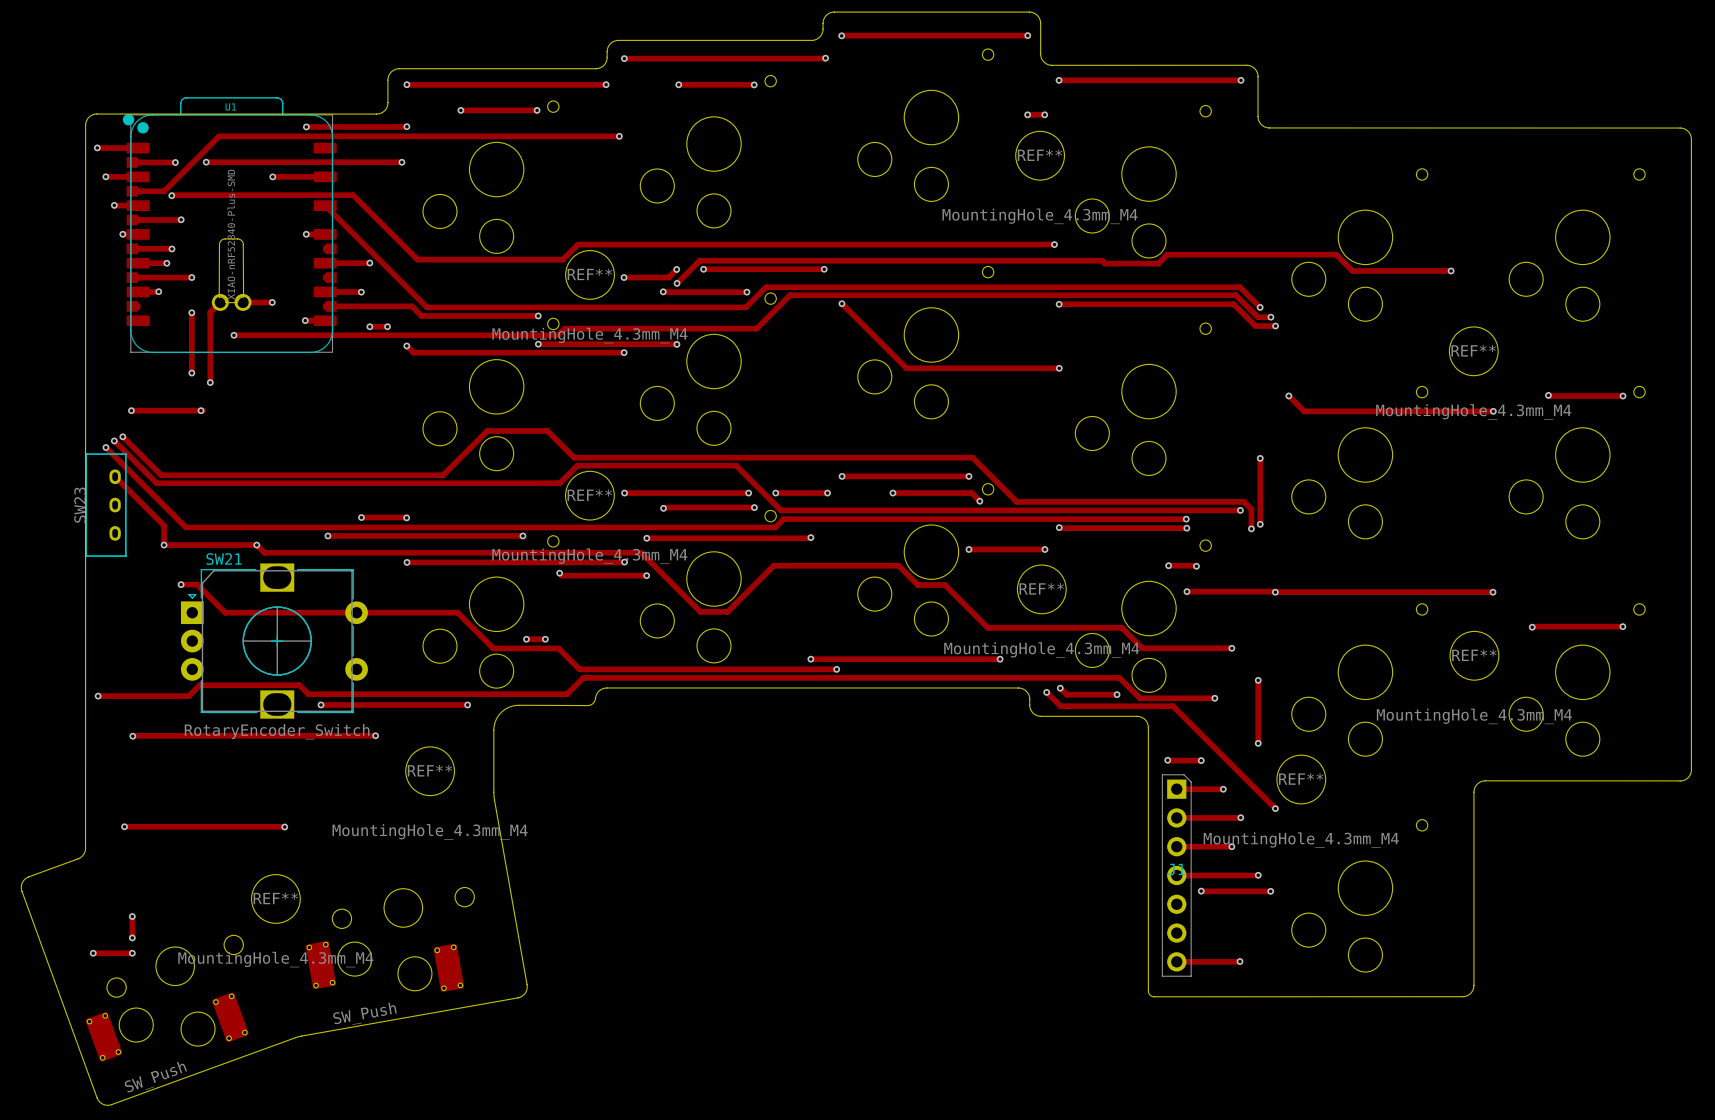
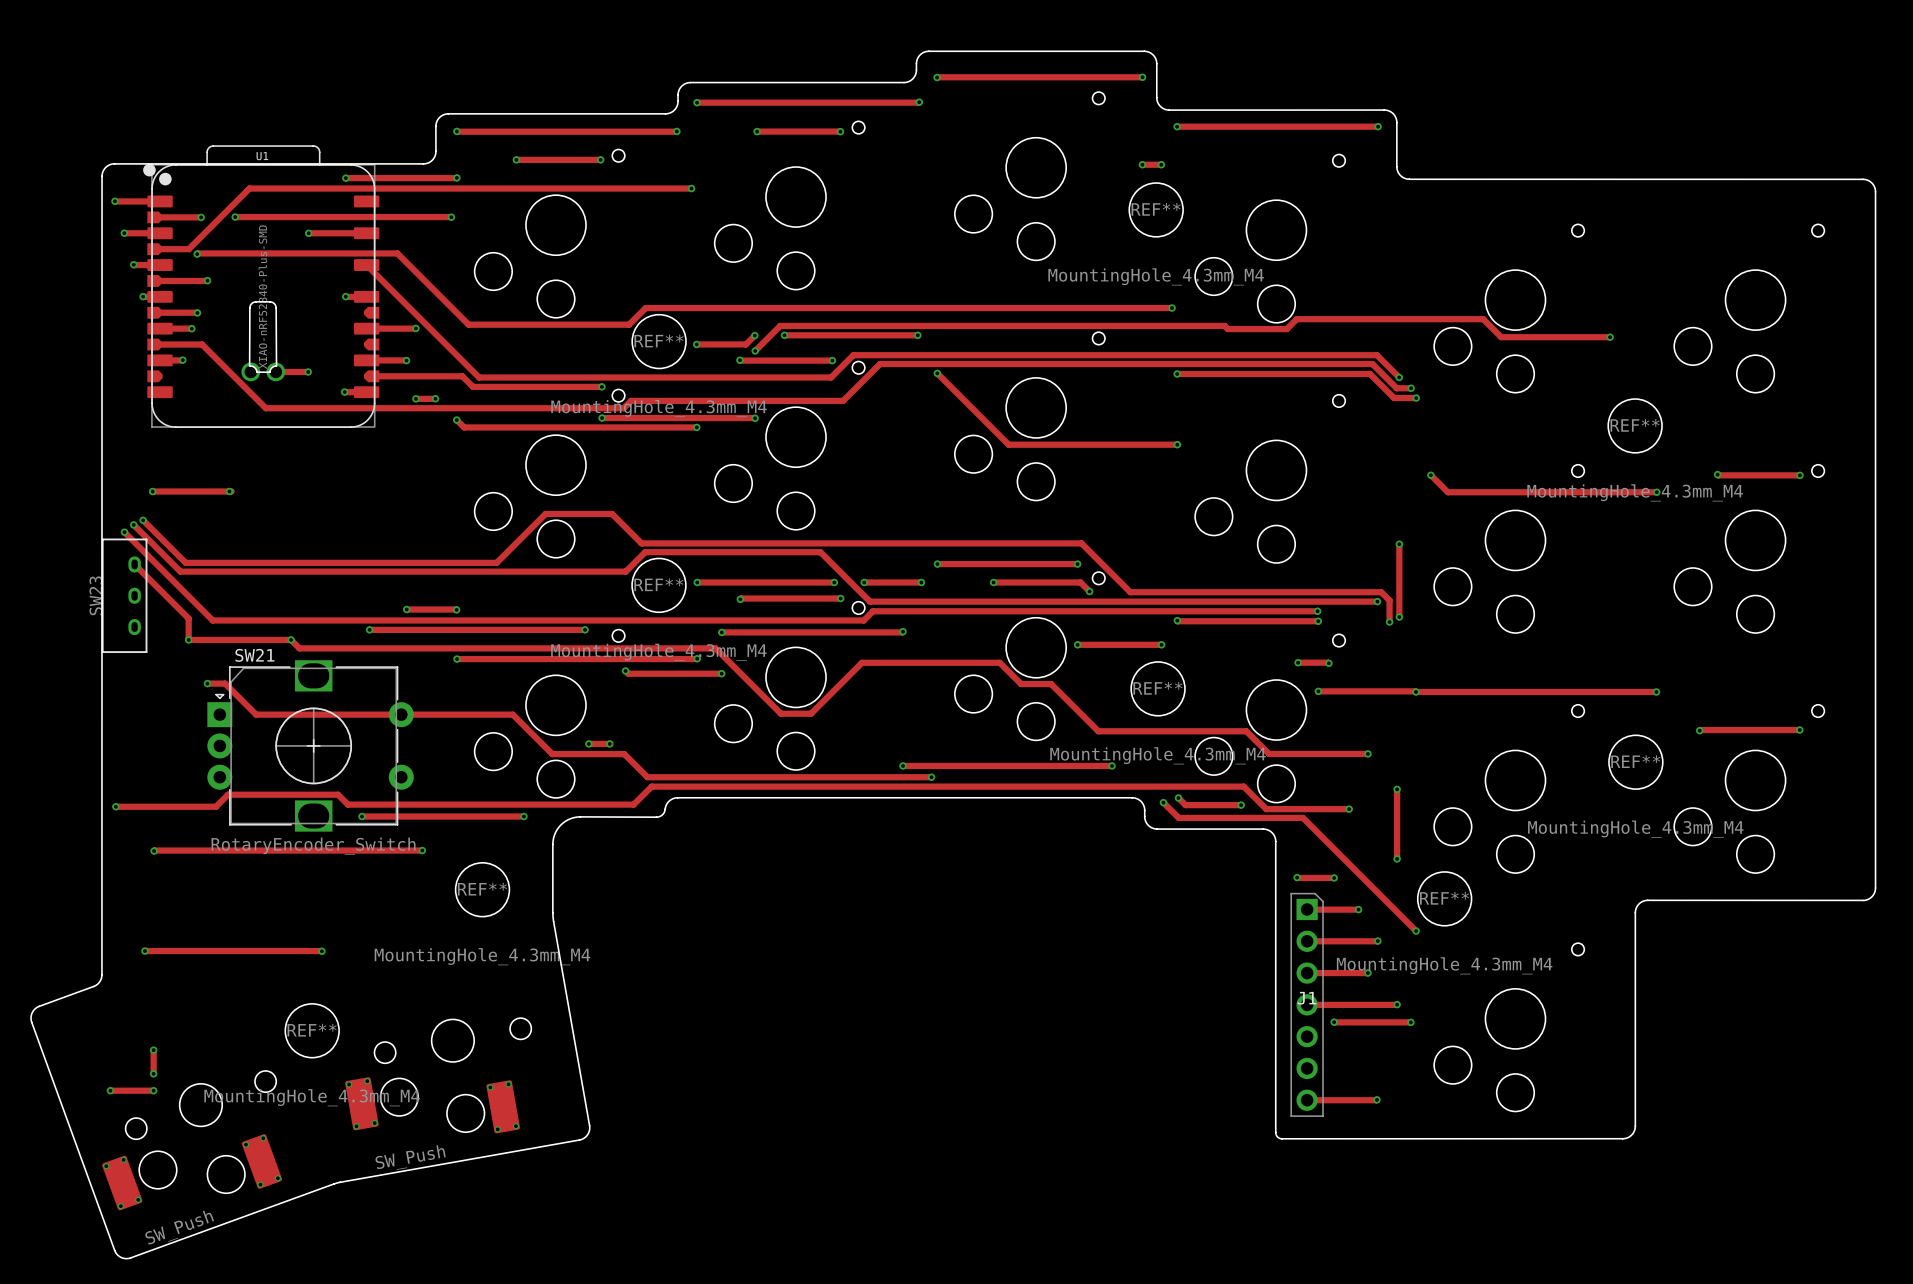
track: (176, 277) (191, 277) -> (202, 344) (265, 408)
via: (191, 277) -> none
track: (220, 302) (210, 312) (210, 382) -> none
track: (191, 312) (191, 373) -> none
via: (191, 312) -> none
via: (233, 335) -> none
via: (191, 373) -> none
via: (210, 382) -> none

